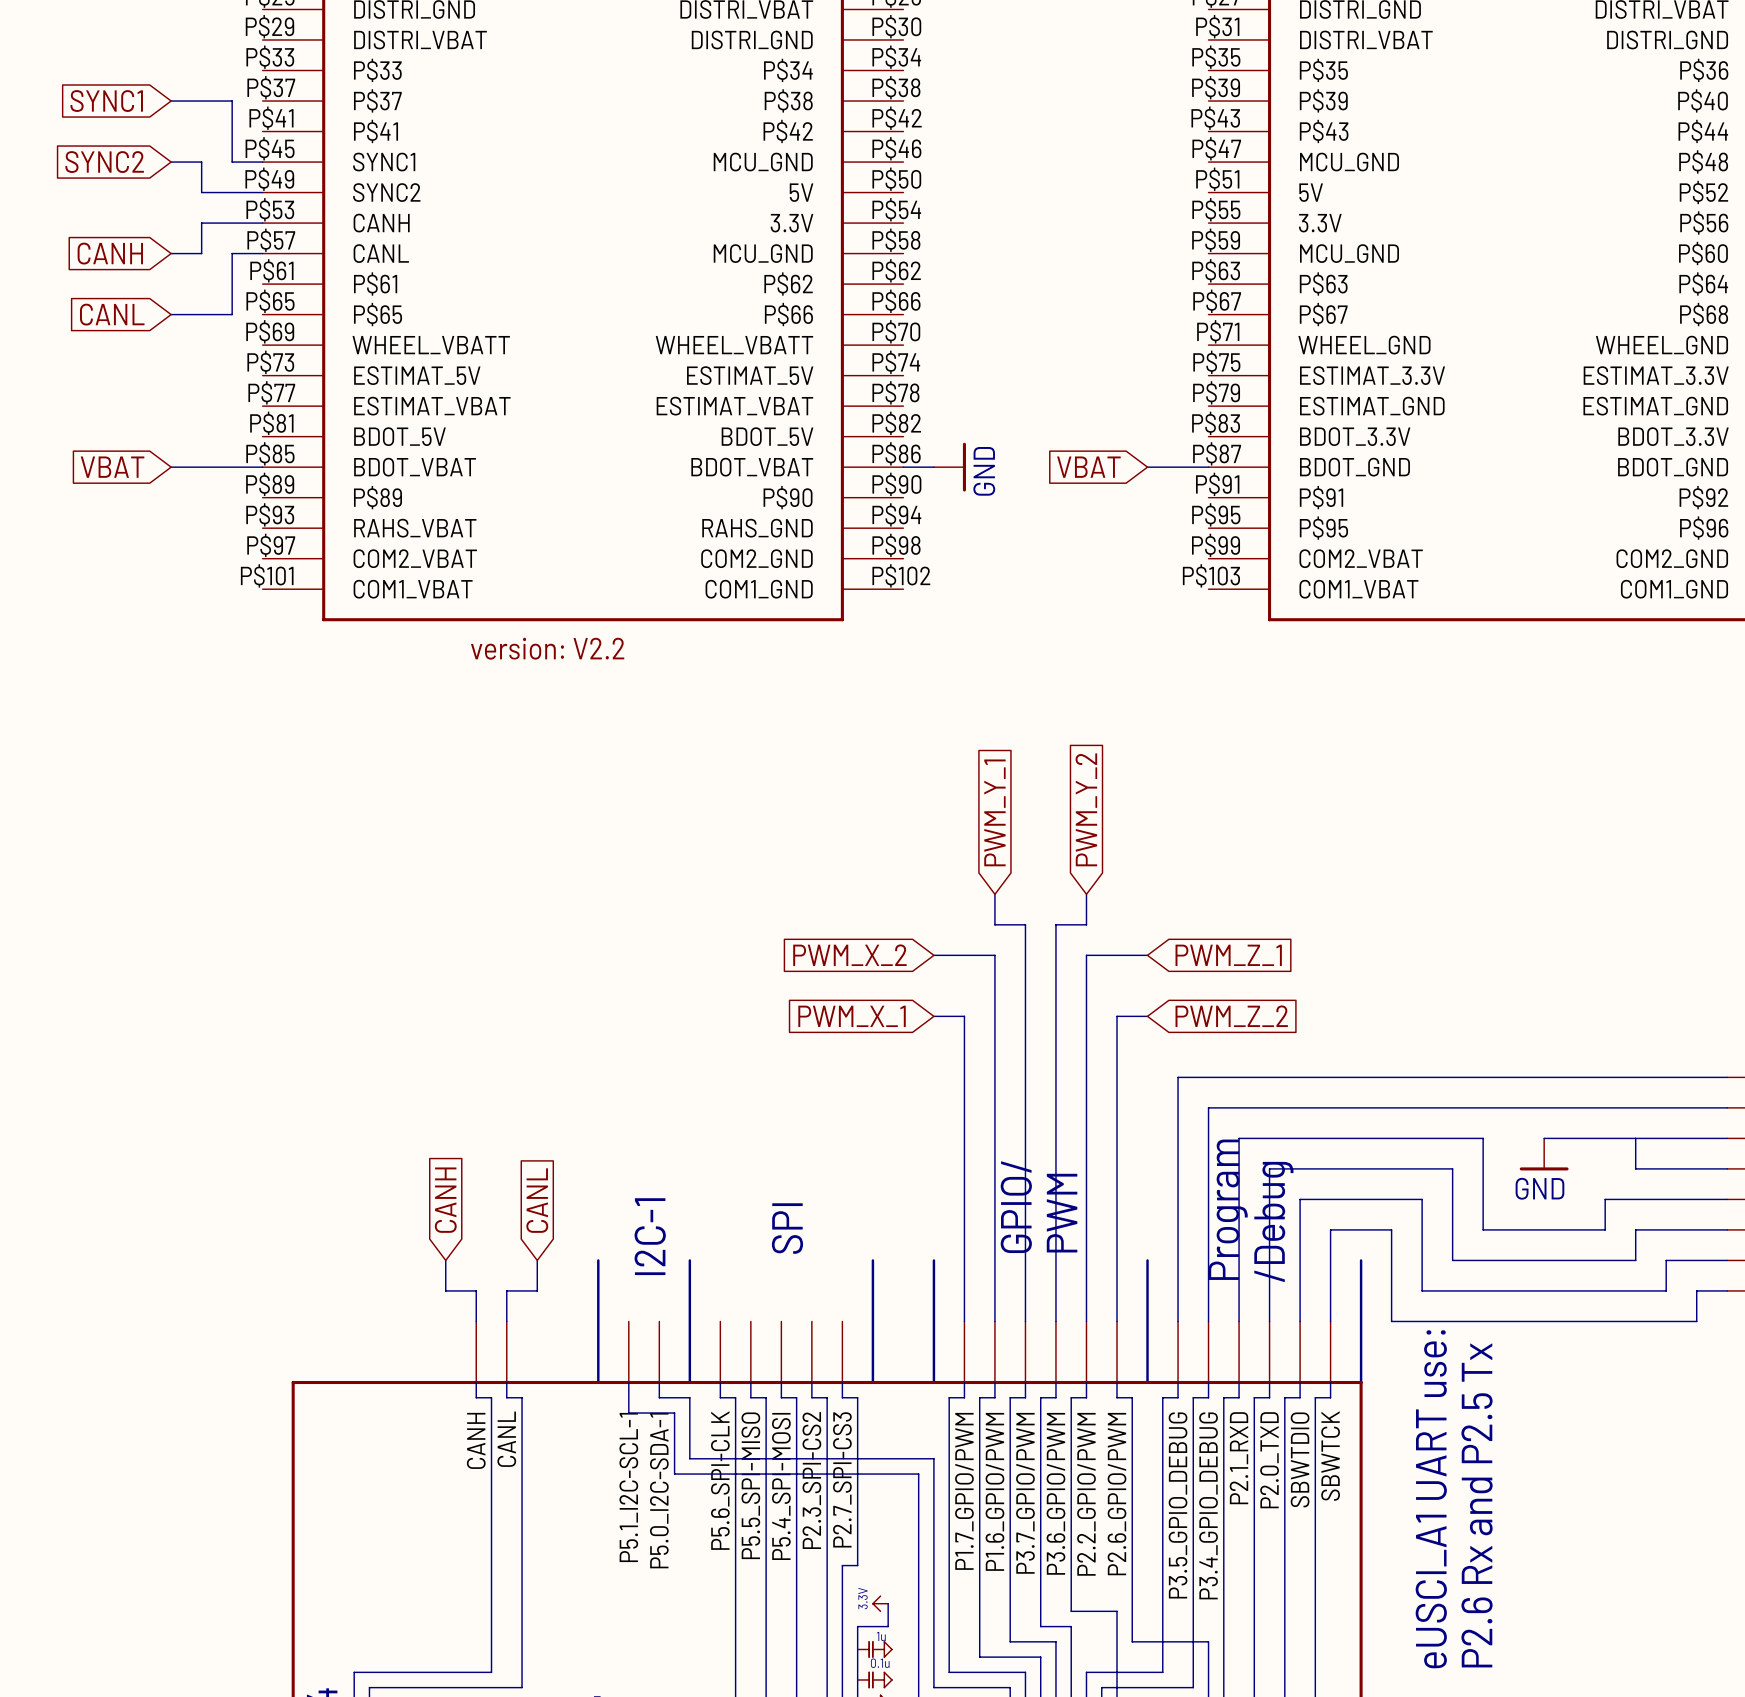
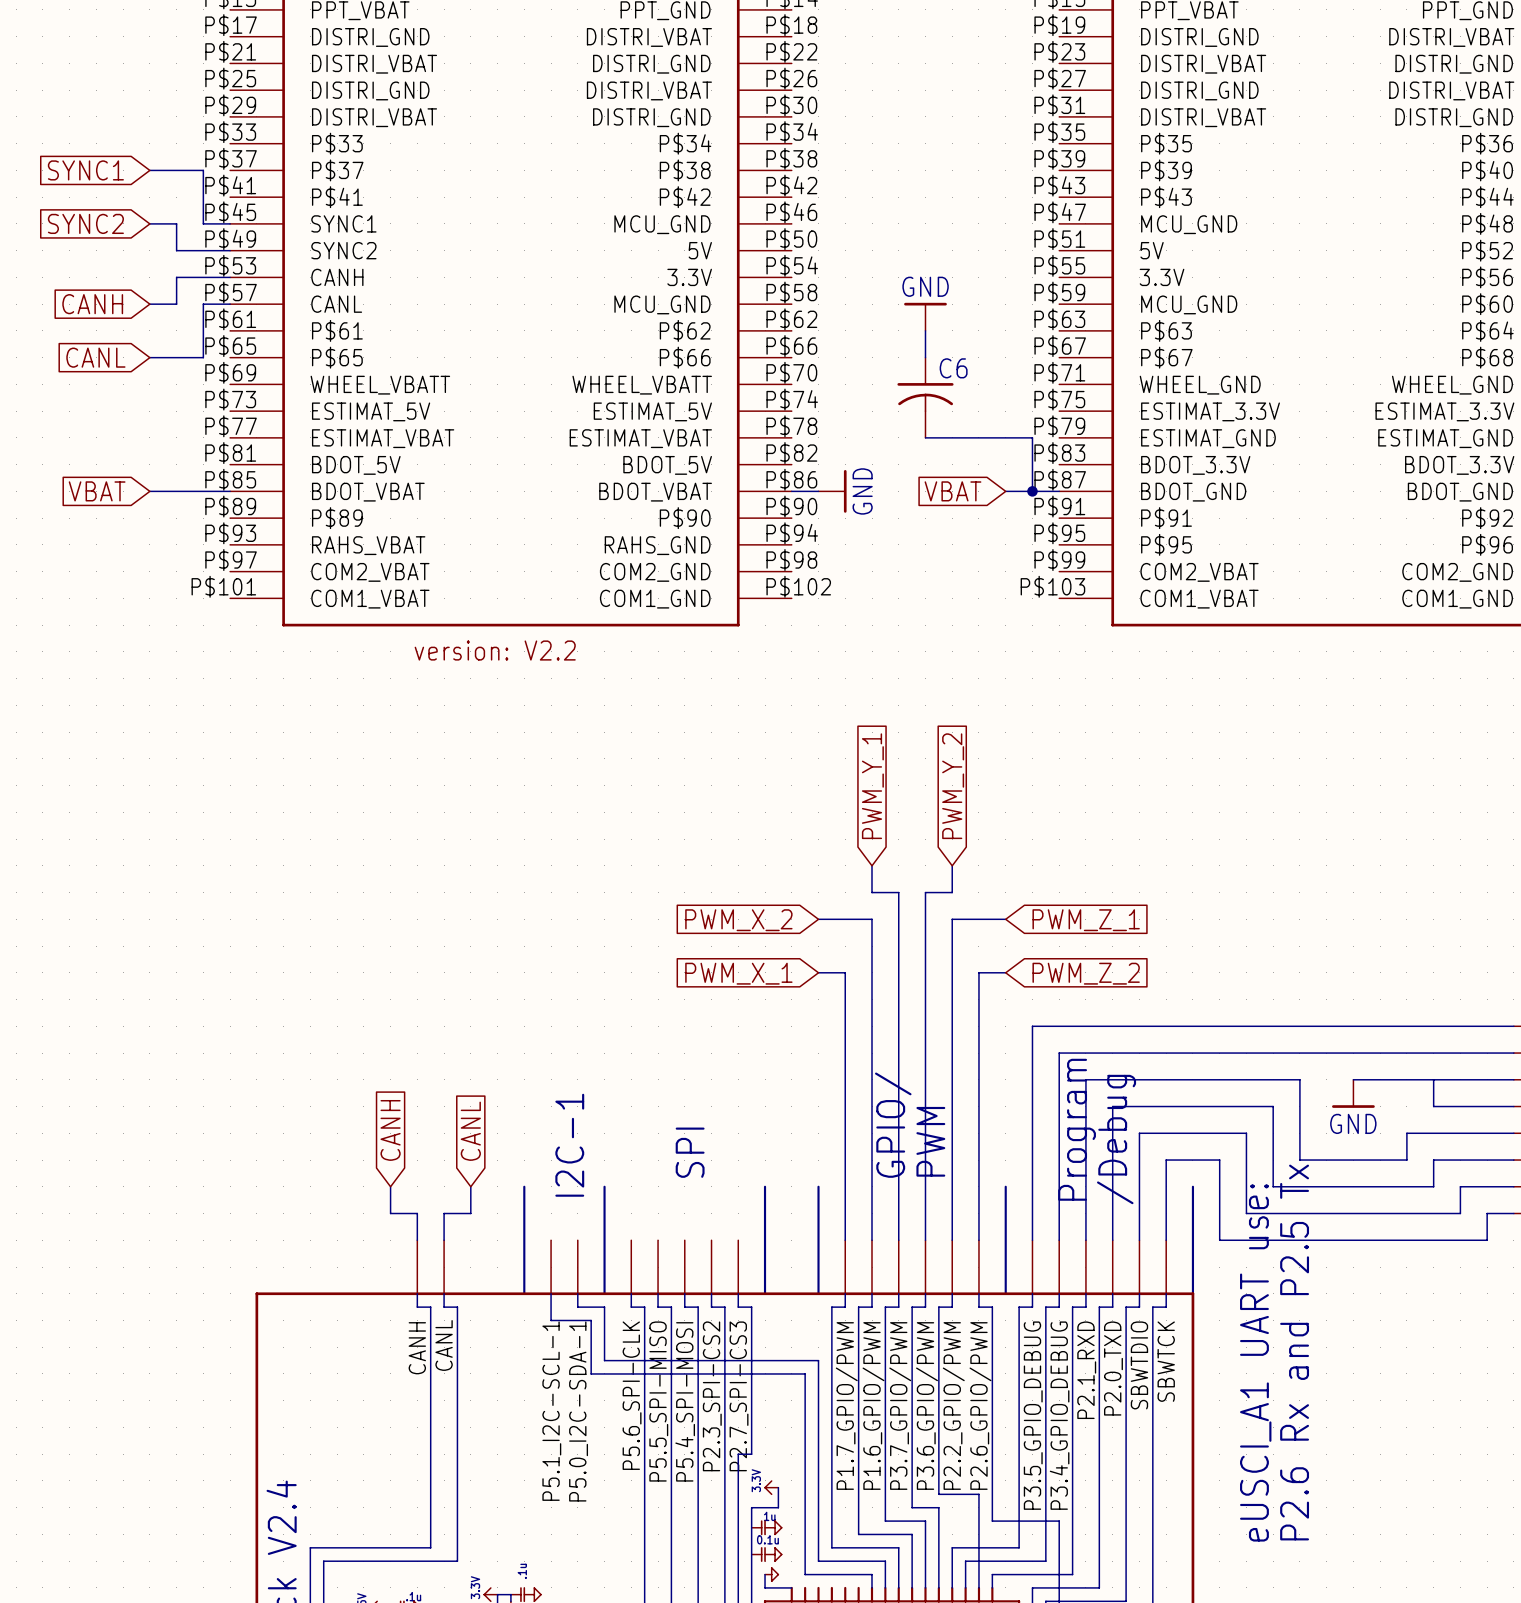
power symbol: none -> GND (925, 316)
wire: none -> (925, 330) (925, 357)
C6: none -> (925, 397)
wire: none -> (925, 437) (1032, 437) (1032, 491)
junction: none -> (1032, 491)

